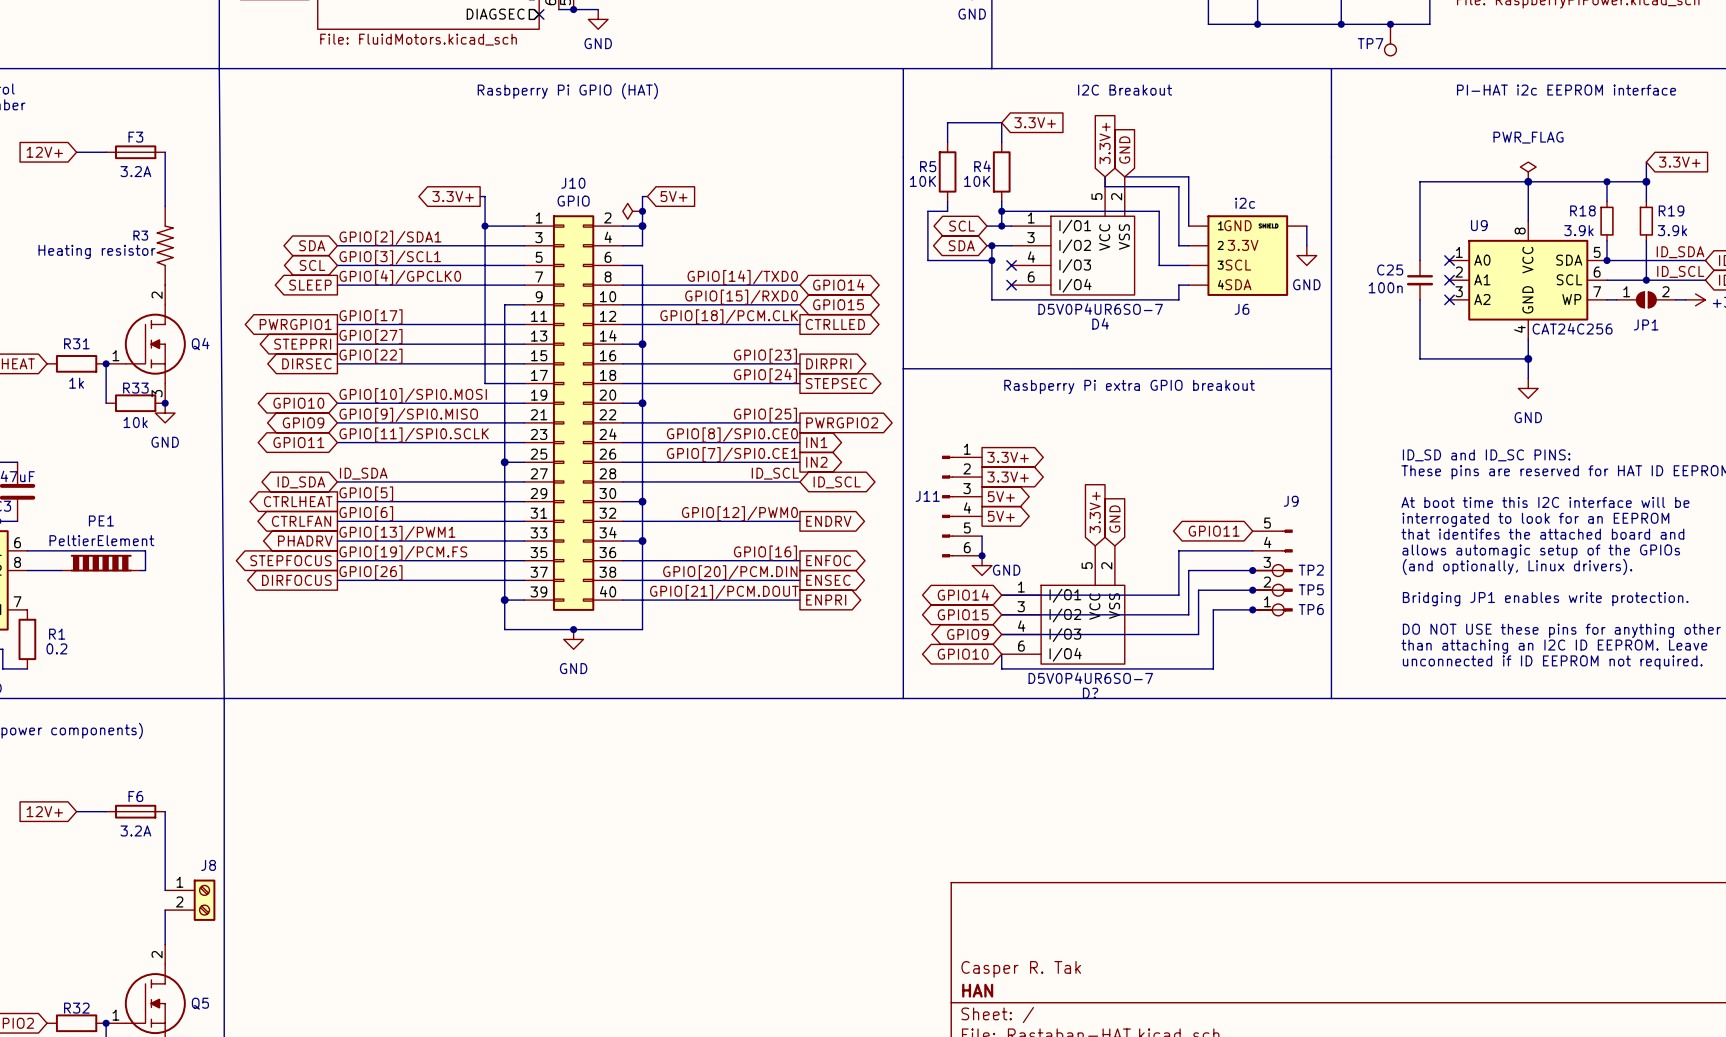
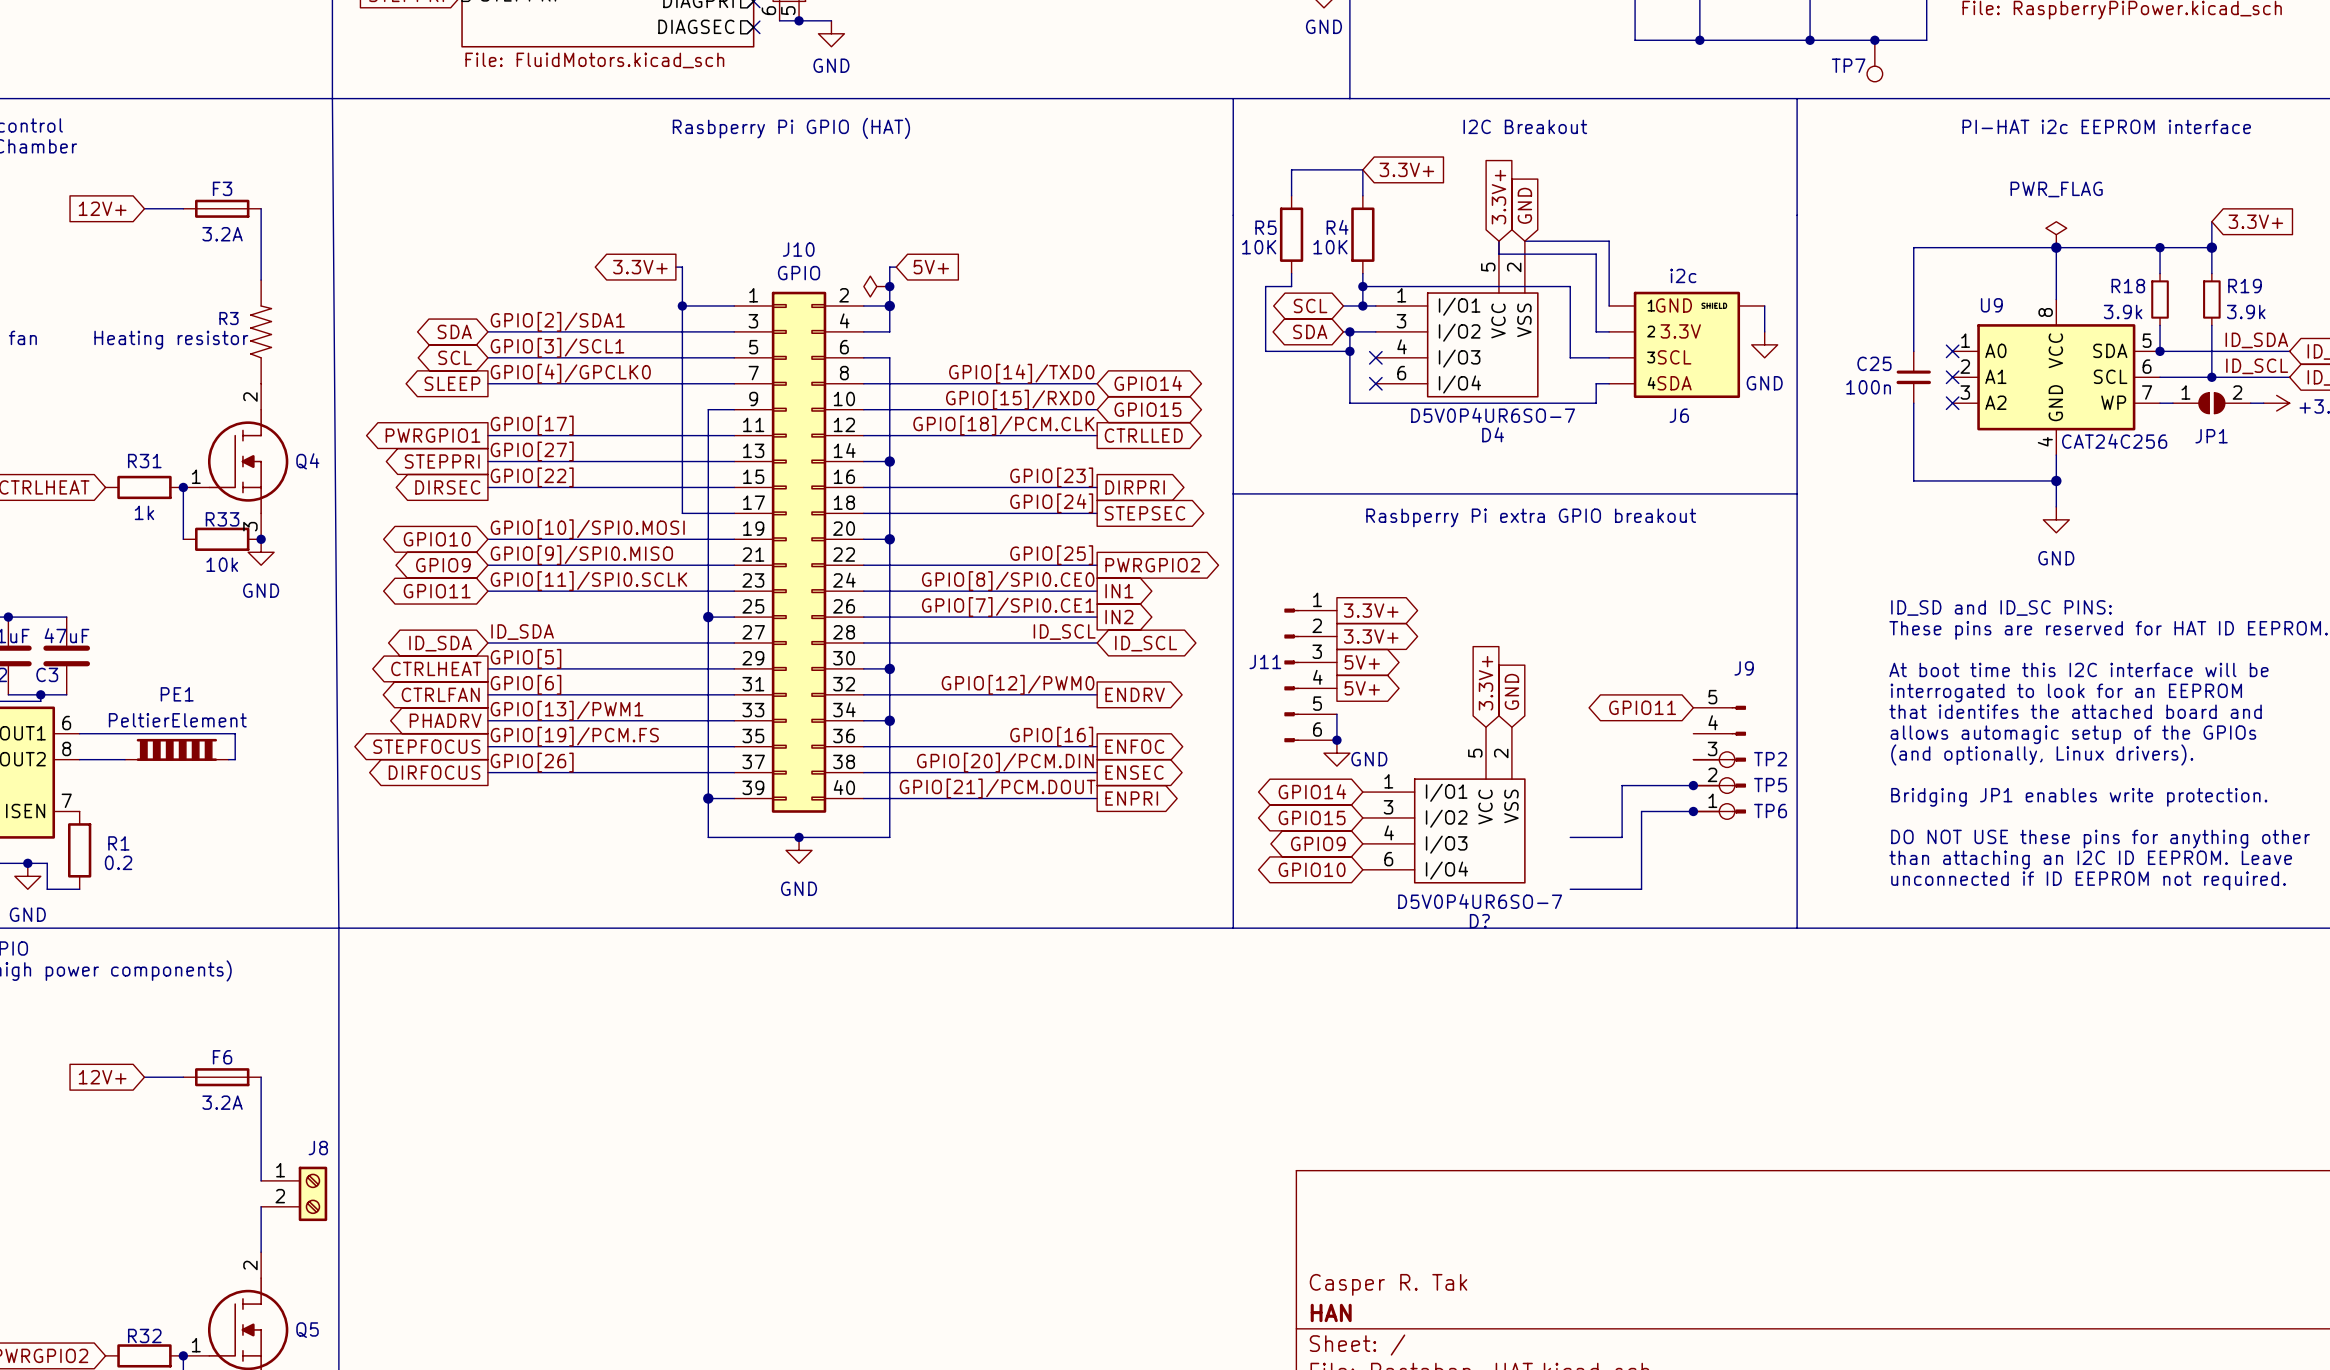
wire: (1252, 550) (1178, 550) (1178, 595) (1001, 595) -> none
wire: (1252, 570) (1188, 570) (1188, 614) (1001, 614) -> none
junction: (1252, 570) -> none
wire: (1198, 629) (1198, 634) (1001, 634) -> (1622, 837) (1570, 837)
wire: (1001, 654) (1001, 668) (1159, 668) -> none

